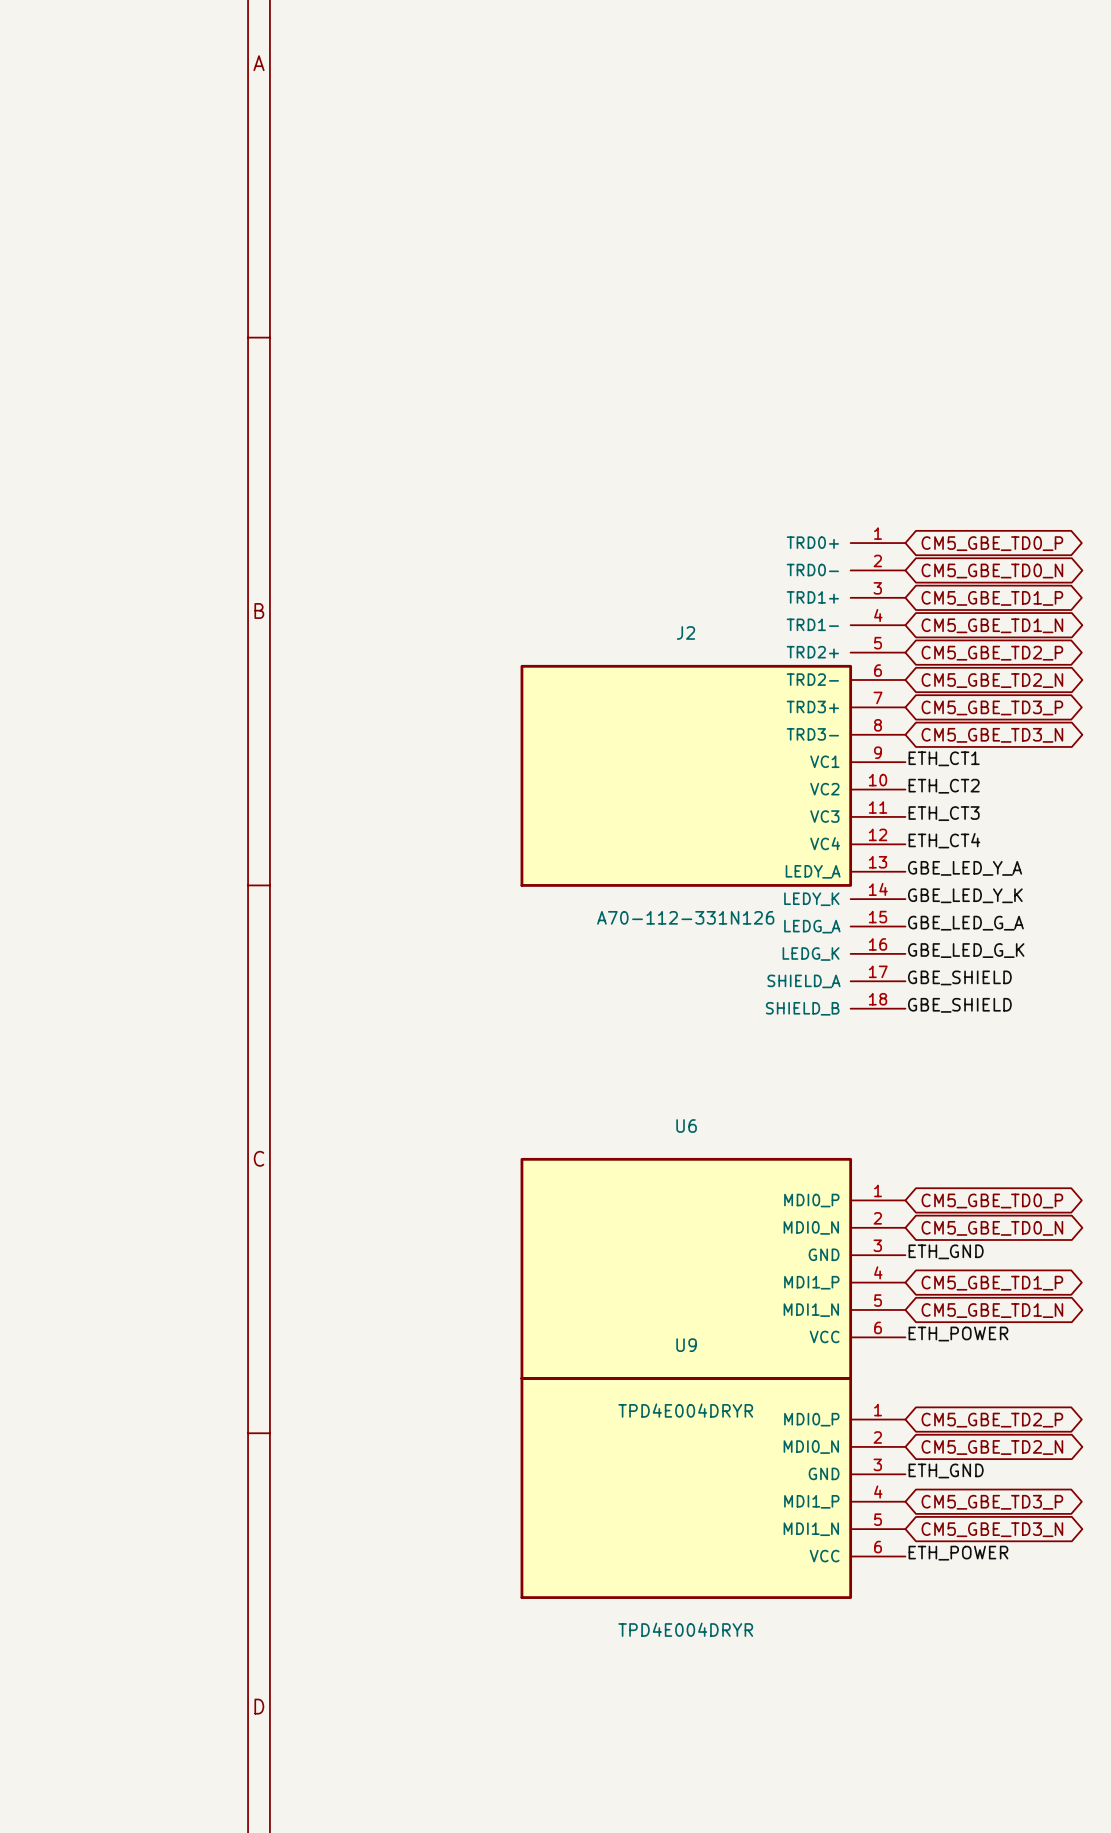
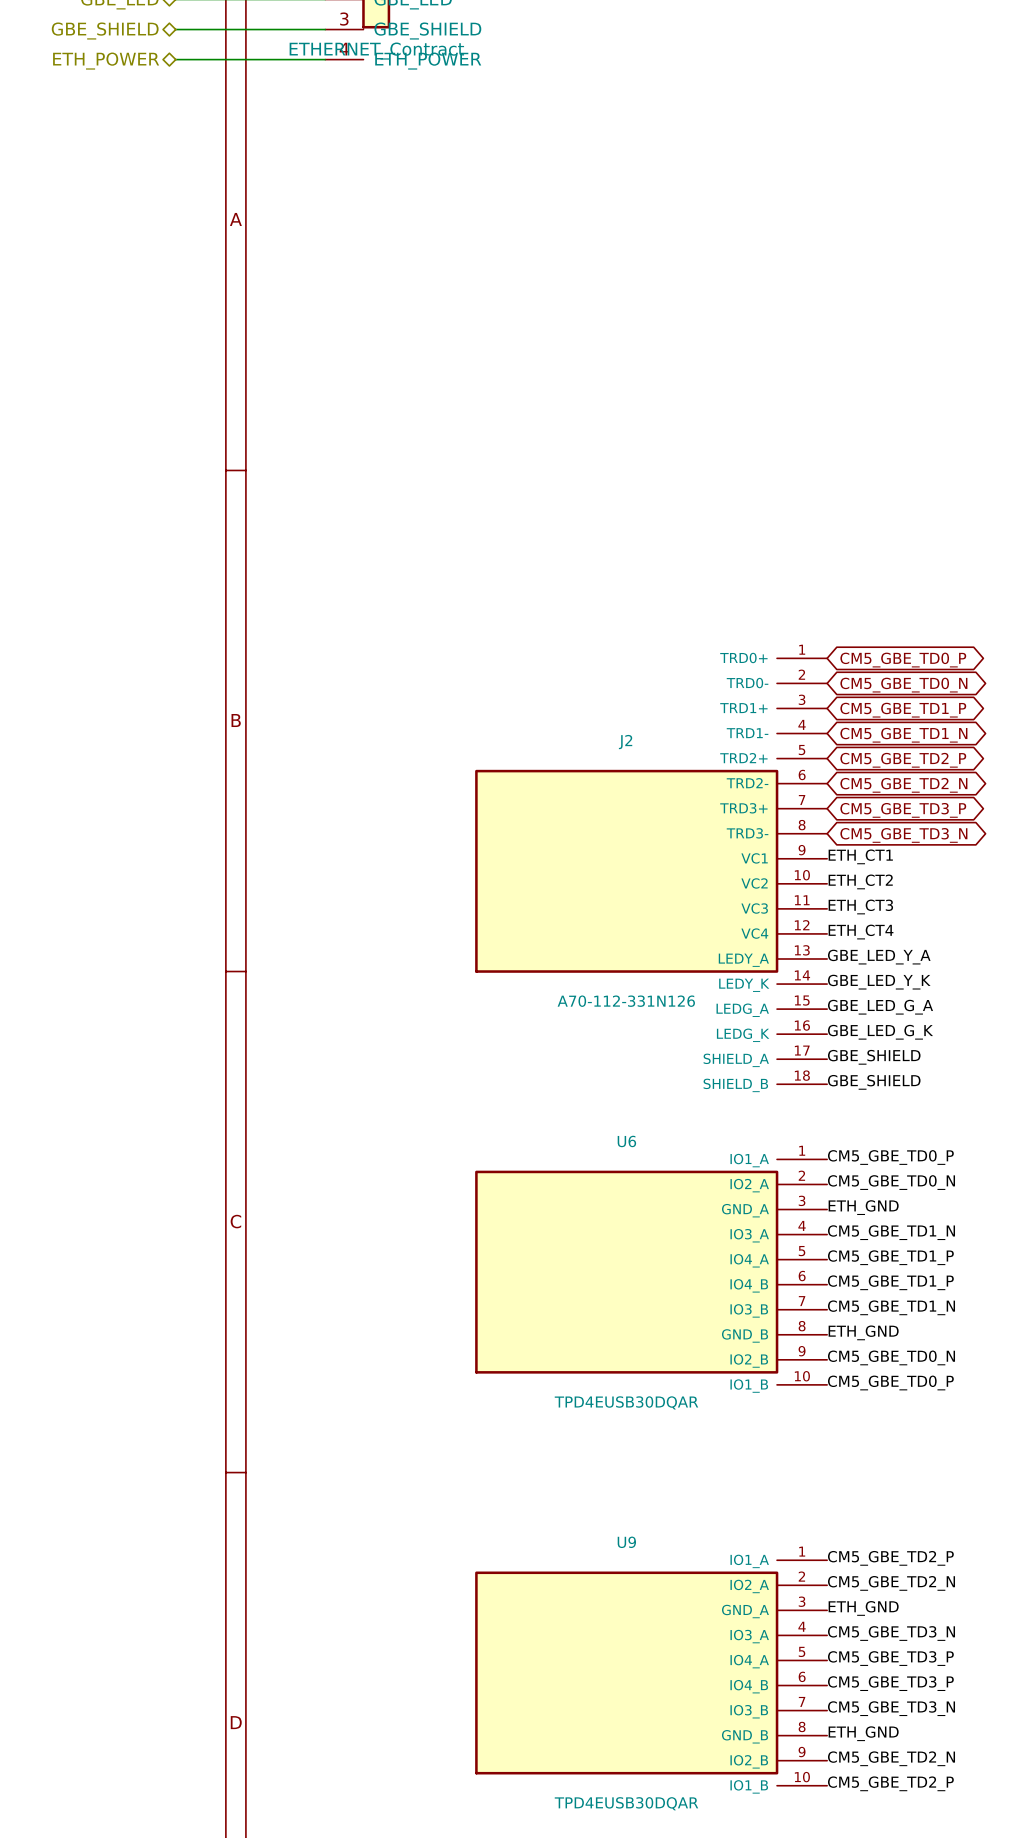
label: none -> CM5_GBE_TD0_P (890, 1157)
label: none -> CM5_GBE_TD0_N (891, 1182)
label: none -> ETH_GND (863, 1207)
U6 symbol: [520, 1157, 906, 1380] -> [475, 1159, 828, 1385]
label: none -> CM5_GBE_TD1_N (891, 1232)
label: none -> CM5_GBE_TD1_P (890, 1257)
global label: CM5_GBE_TD0_P (992, 1200) -> none
label: none -> CM5_GBE_TD1_P (890, 1282)
global label: CM5_GBE_TD0_N (992, 1228) -> none
label: ETH_GND (946, 1251) -> CM5_GBE_TD1_N (891, 1307)
label: none -> ETH_GND (863, 1332)
global label: CM5_GBE_TD1_P (992, 1283) -> none
label: none -> CM5_GBE_TD0_N (891, 1357)
global label: CM5_GBE_TD1_N (992, 1310) -> none
label: ETH_POWER (958, 1334) -> CM5_GBE_TD0_P (890, 1382)
U9 symbol: [520, 1377, 906, 1599] -> [475, 1560, 828, 1786]
U6 value: TPD4E004DRYR (685, 1410) -> TPD4EUSB30DQAR (626, 1402)
global label: CM5_GBE_TD2_P (992, 1420) -> none
global label: CM5_GBE_TD2_N (992, 1447) -> none
label: ETH_GND (946, 1470) -> none
global label: CM5_GBE_TD3_P (992, 1502) -> none
label: none -> CM5_GBE_TD2_P (890, 1558)
global label: CM5_GBE_TD3_N (992, 1529) -> none
label: ETH_POWER (958, 1553) -> CM5_GBE_TD2_N (891, 1583)
label: none -> ETH_GND (863, 1608)
label: none -> CM5_GBE_TD3_N (891, 1633)
U9 value: TPD4E004DRYR (685, 1629) -> TPD4EUSB30DQAR (626, 1803)
label: none -> CM5_GBE_TD3_P (890, 1658)
label: none -> CM5_GBE_TD3_P (890, 1683)
label: none -> CM5_GBE_TD3_N (891, 1708)
label: none -> ETH_GND (863, 1733)
label: none -> CM5_GBE_TD2_N (891, 1758)
label: none -> CM5_GBE_TD2_P (890, 1783)

